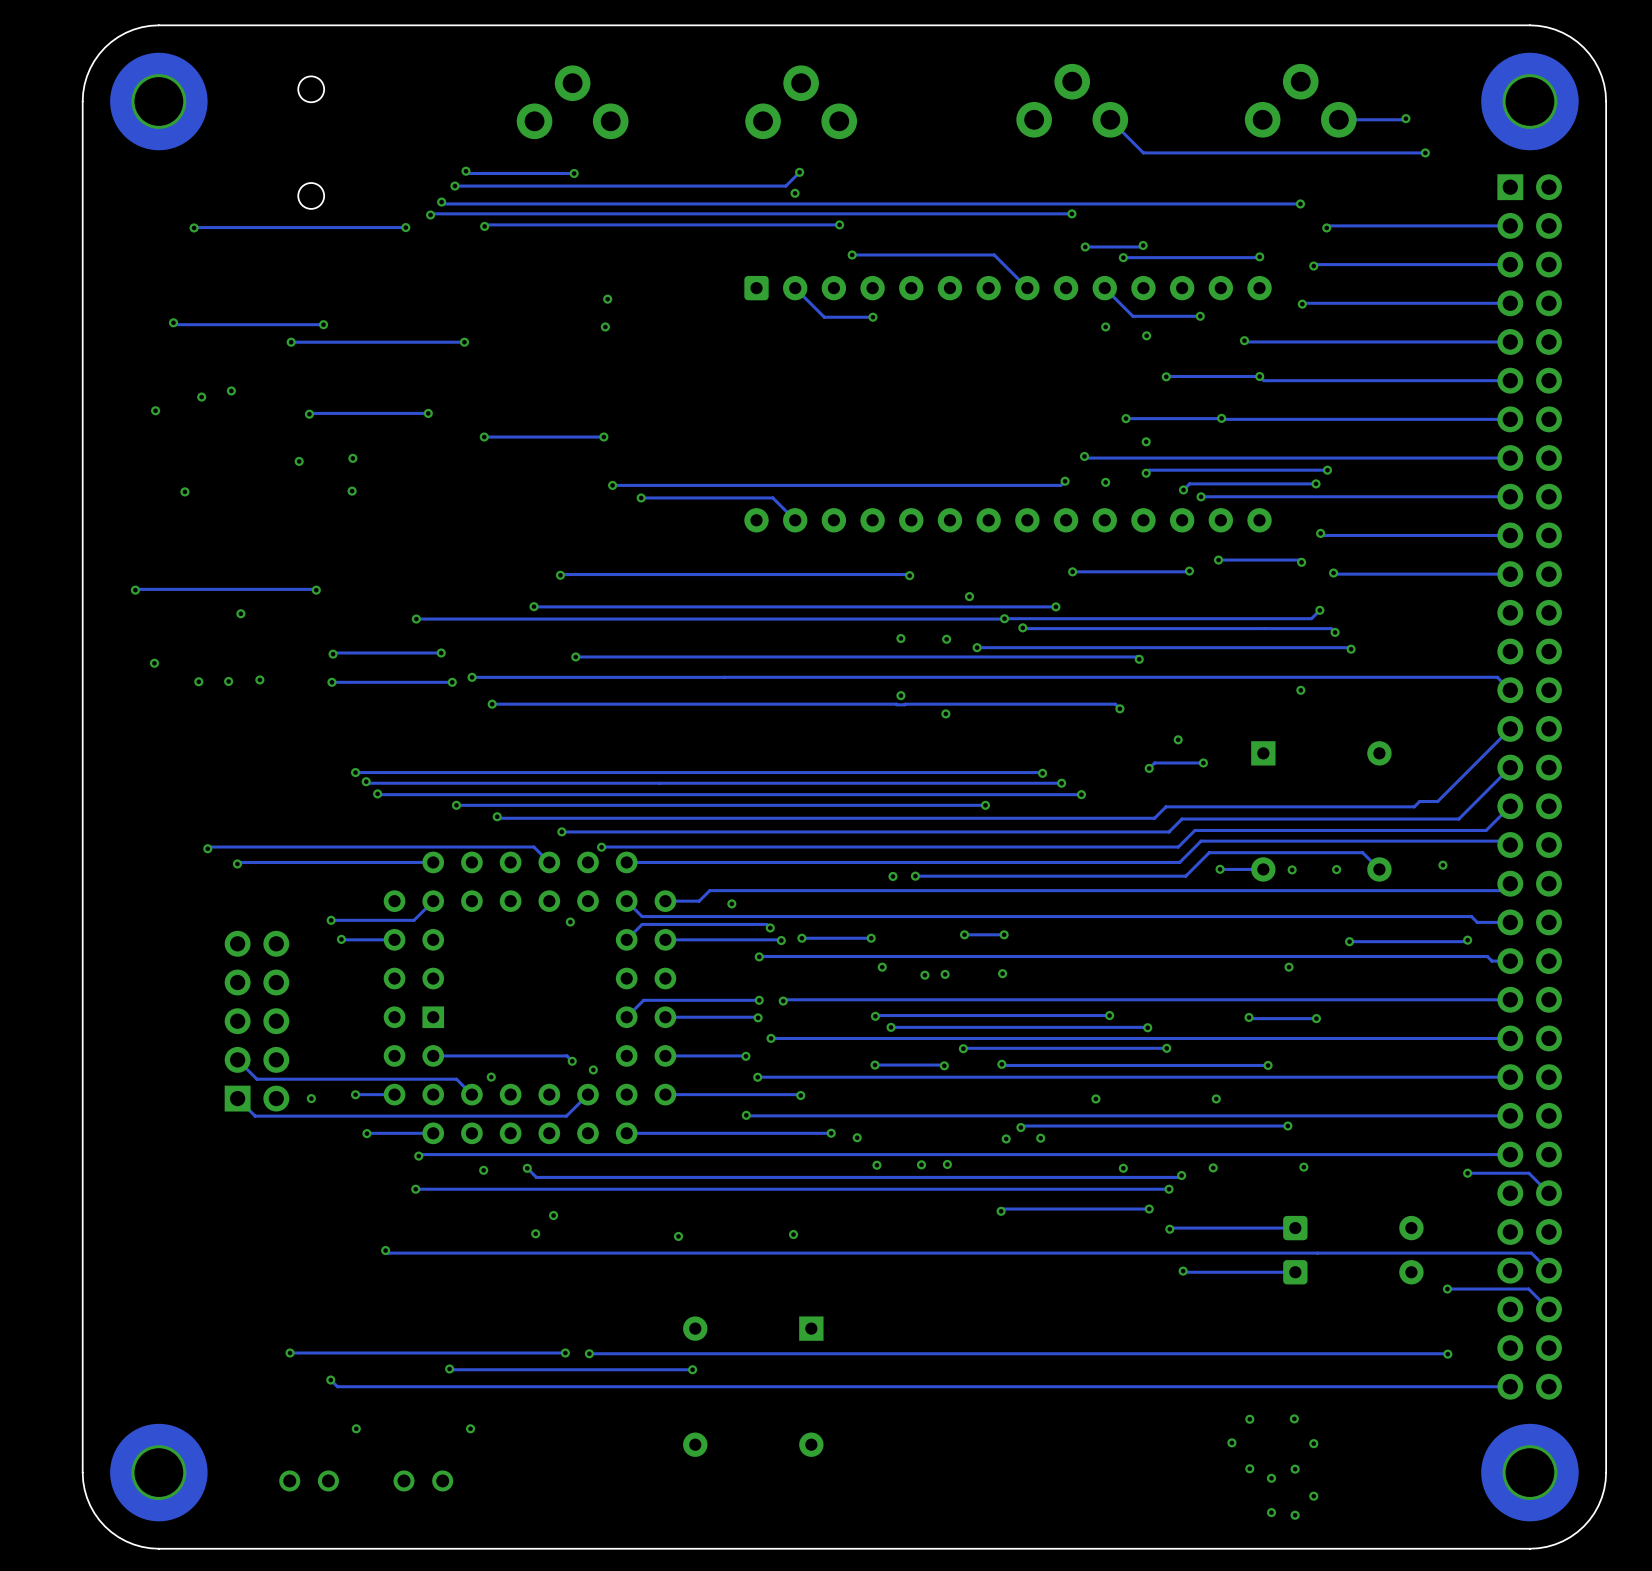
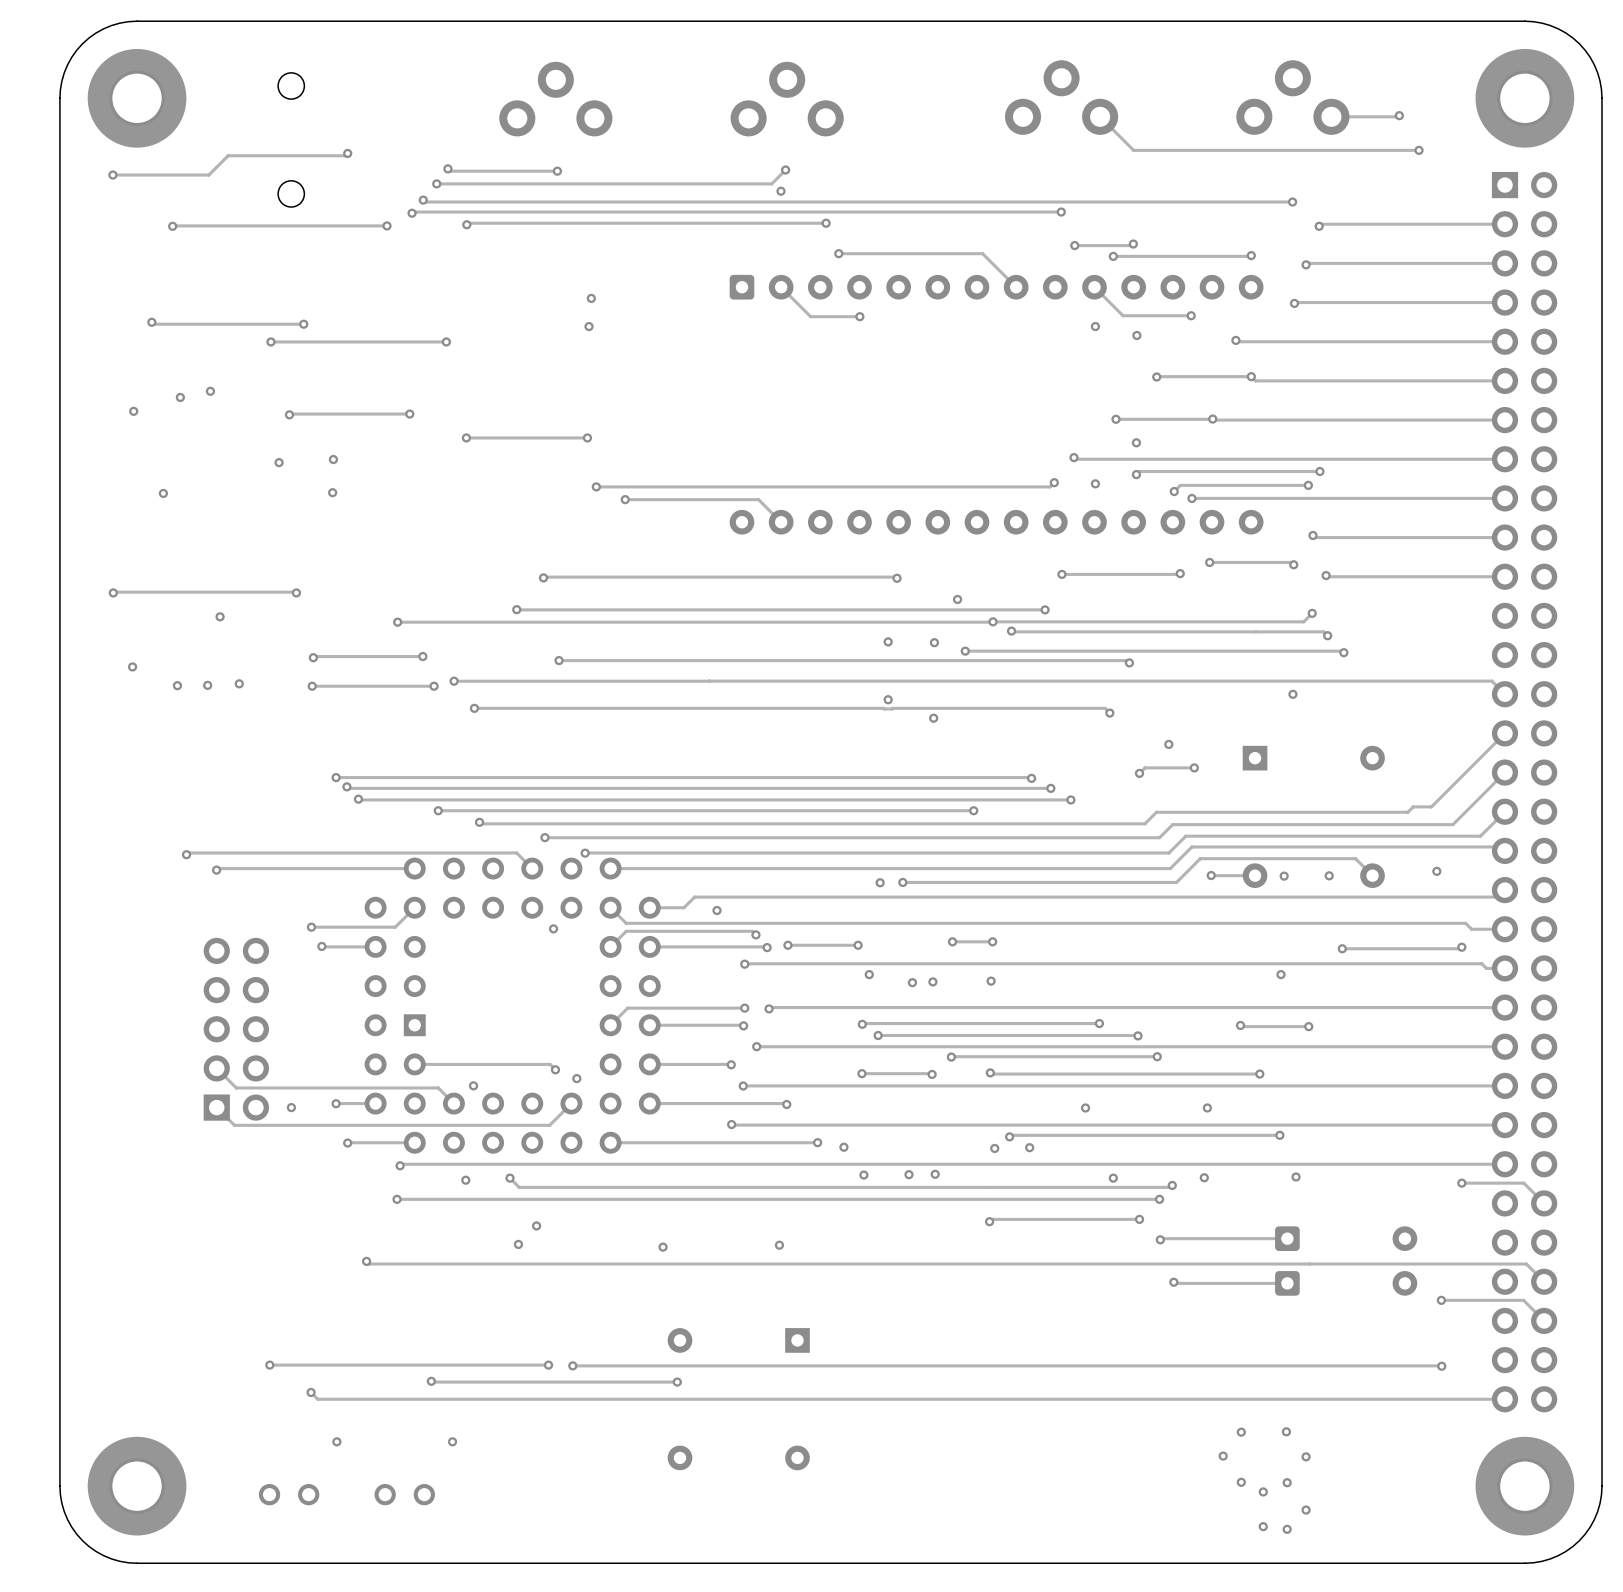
track: none -> (347, 153) (345, 155) (228, 155) (208, 175) (112, 175)
via: none -> (347, 153)
via: none -> (112, 175)

